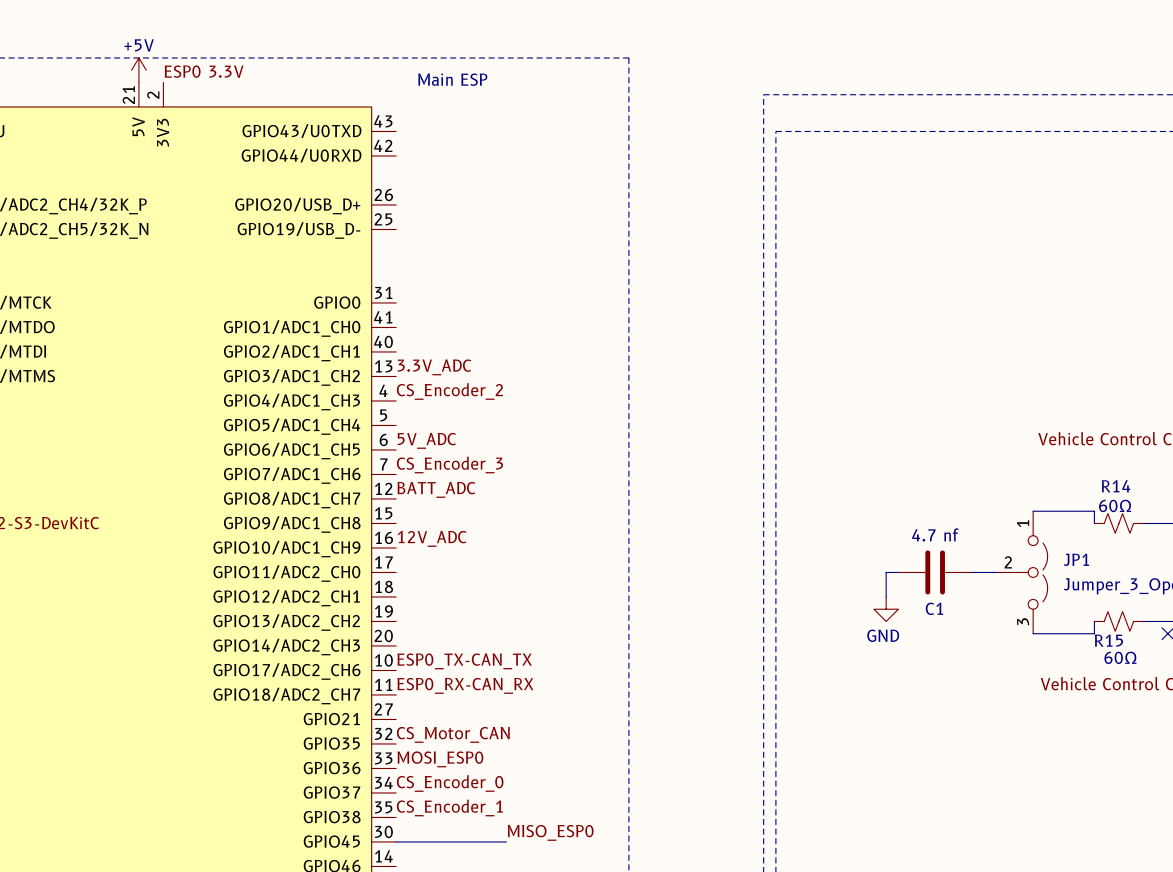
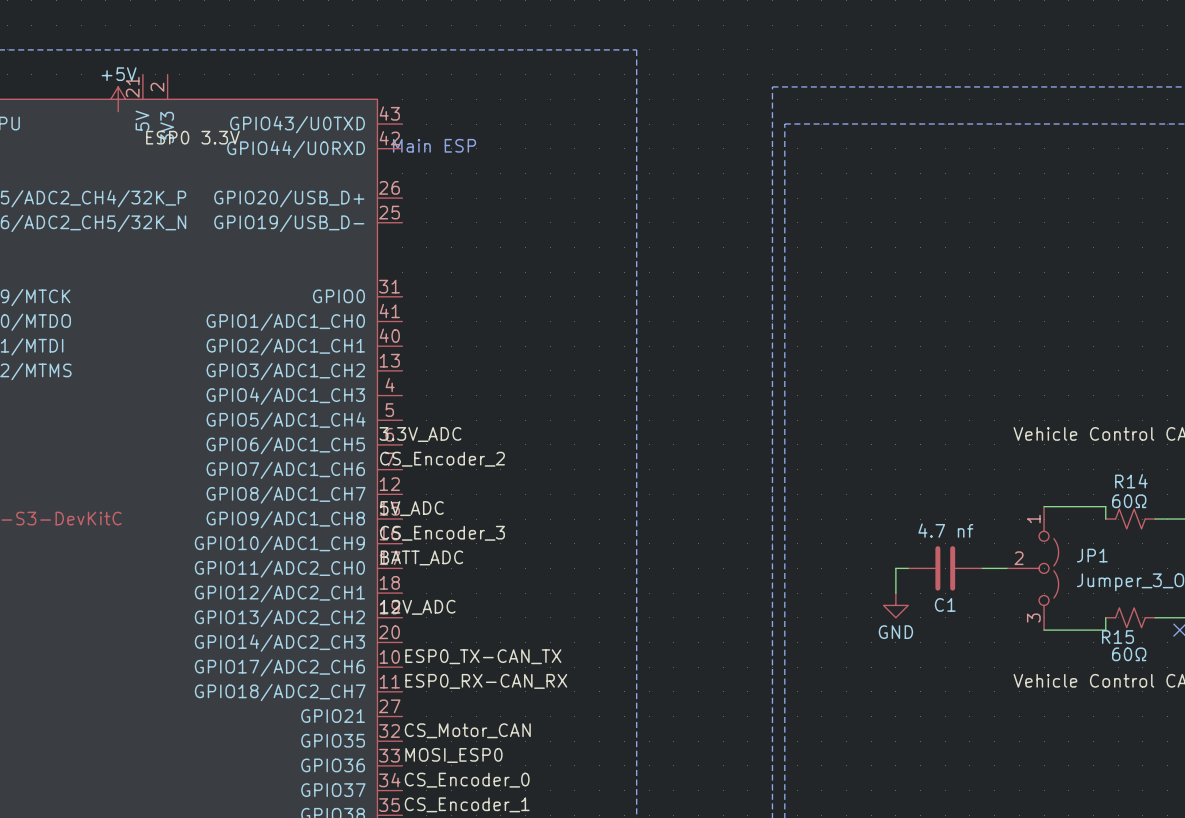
power symbol position: +5V (138, 70) -> +5V (118, 99)
label position: ESP0 3.3V (204, 71) -> ESP0 3.3V (192, 137)
text position: Main ESP (452, 79) -> Main ESP (434, 145)
label position: 3.3V_ADC (434, 367) -> 3.3V_ADC (420, 434)
label position: CS_Encoder_2 (449, 391) -> CS_Encoder_2 (442, 459)
label position: 5V_ADC (426, 440) -> 5V_ADC (411, 508)
label position: CS_Encoder_3 (449, 464) -> CS_Encoder_3 (442, 533)
label position: BATT_ADC (436, 489) -> BATT_ADC (421, 557)
label position: 12V_ADC (432, 538) -> 12V_ADC (417, 607)

